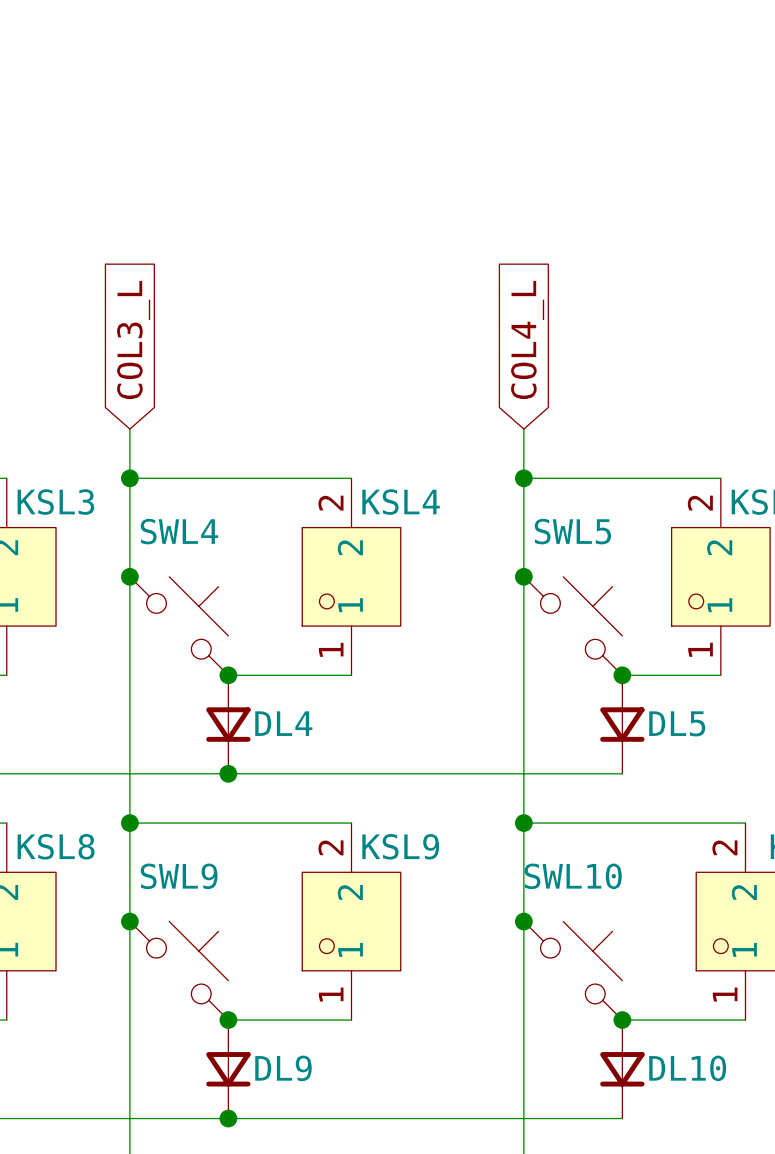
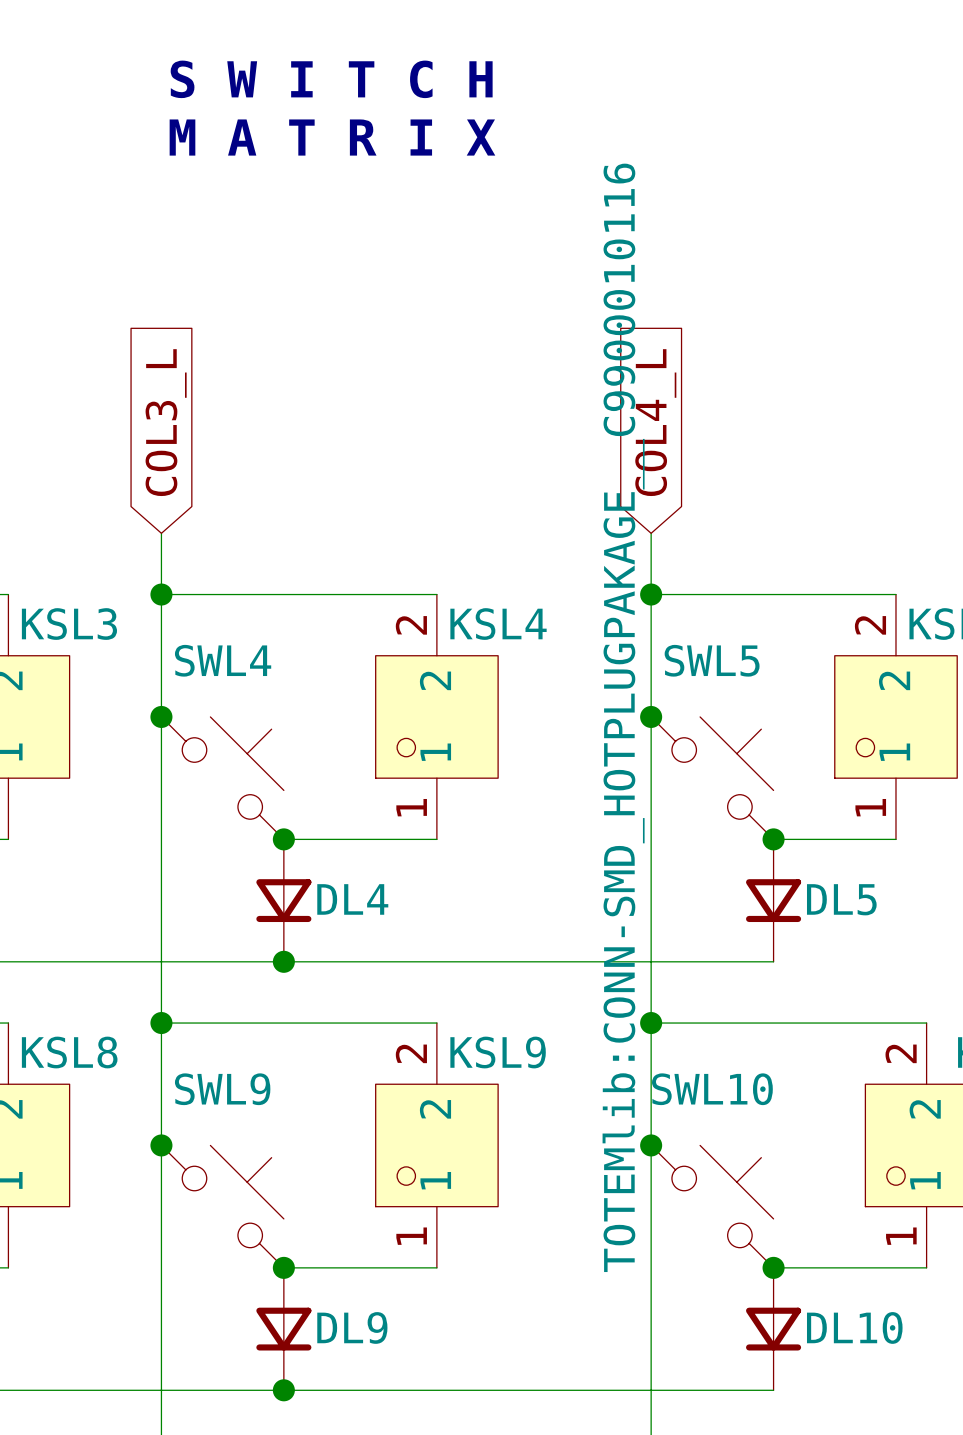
text: none -> S W I T C H (331, 79)
text: none -> M A T R I X (332, 137)
KSL4 text: none -> TOTEMlib:CONN-SMD_HOTPLUGPAKAGE__C9900010116 (623, 717)

